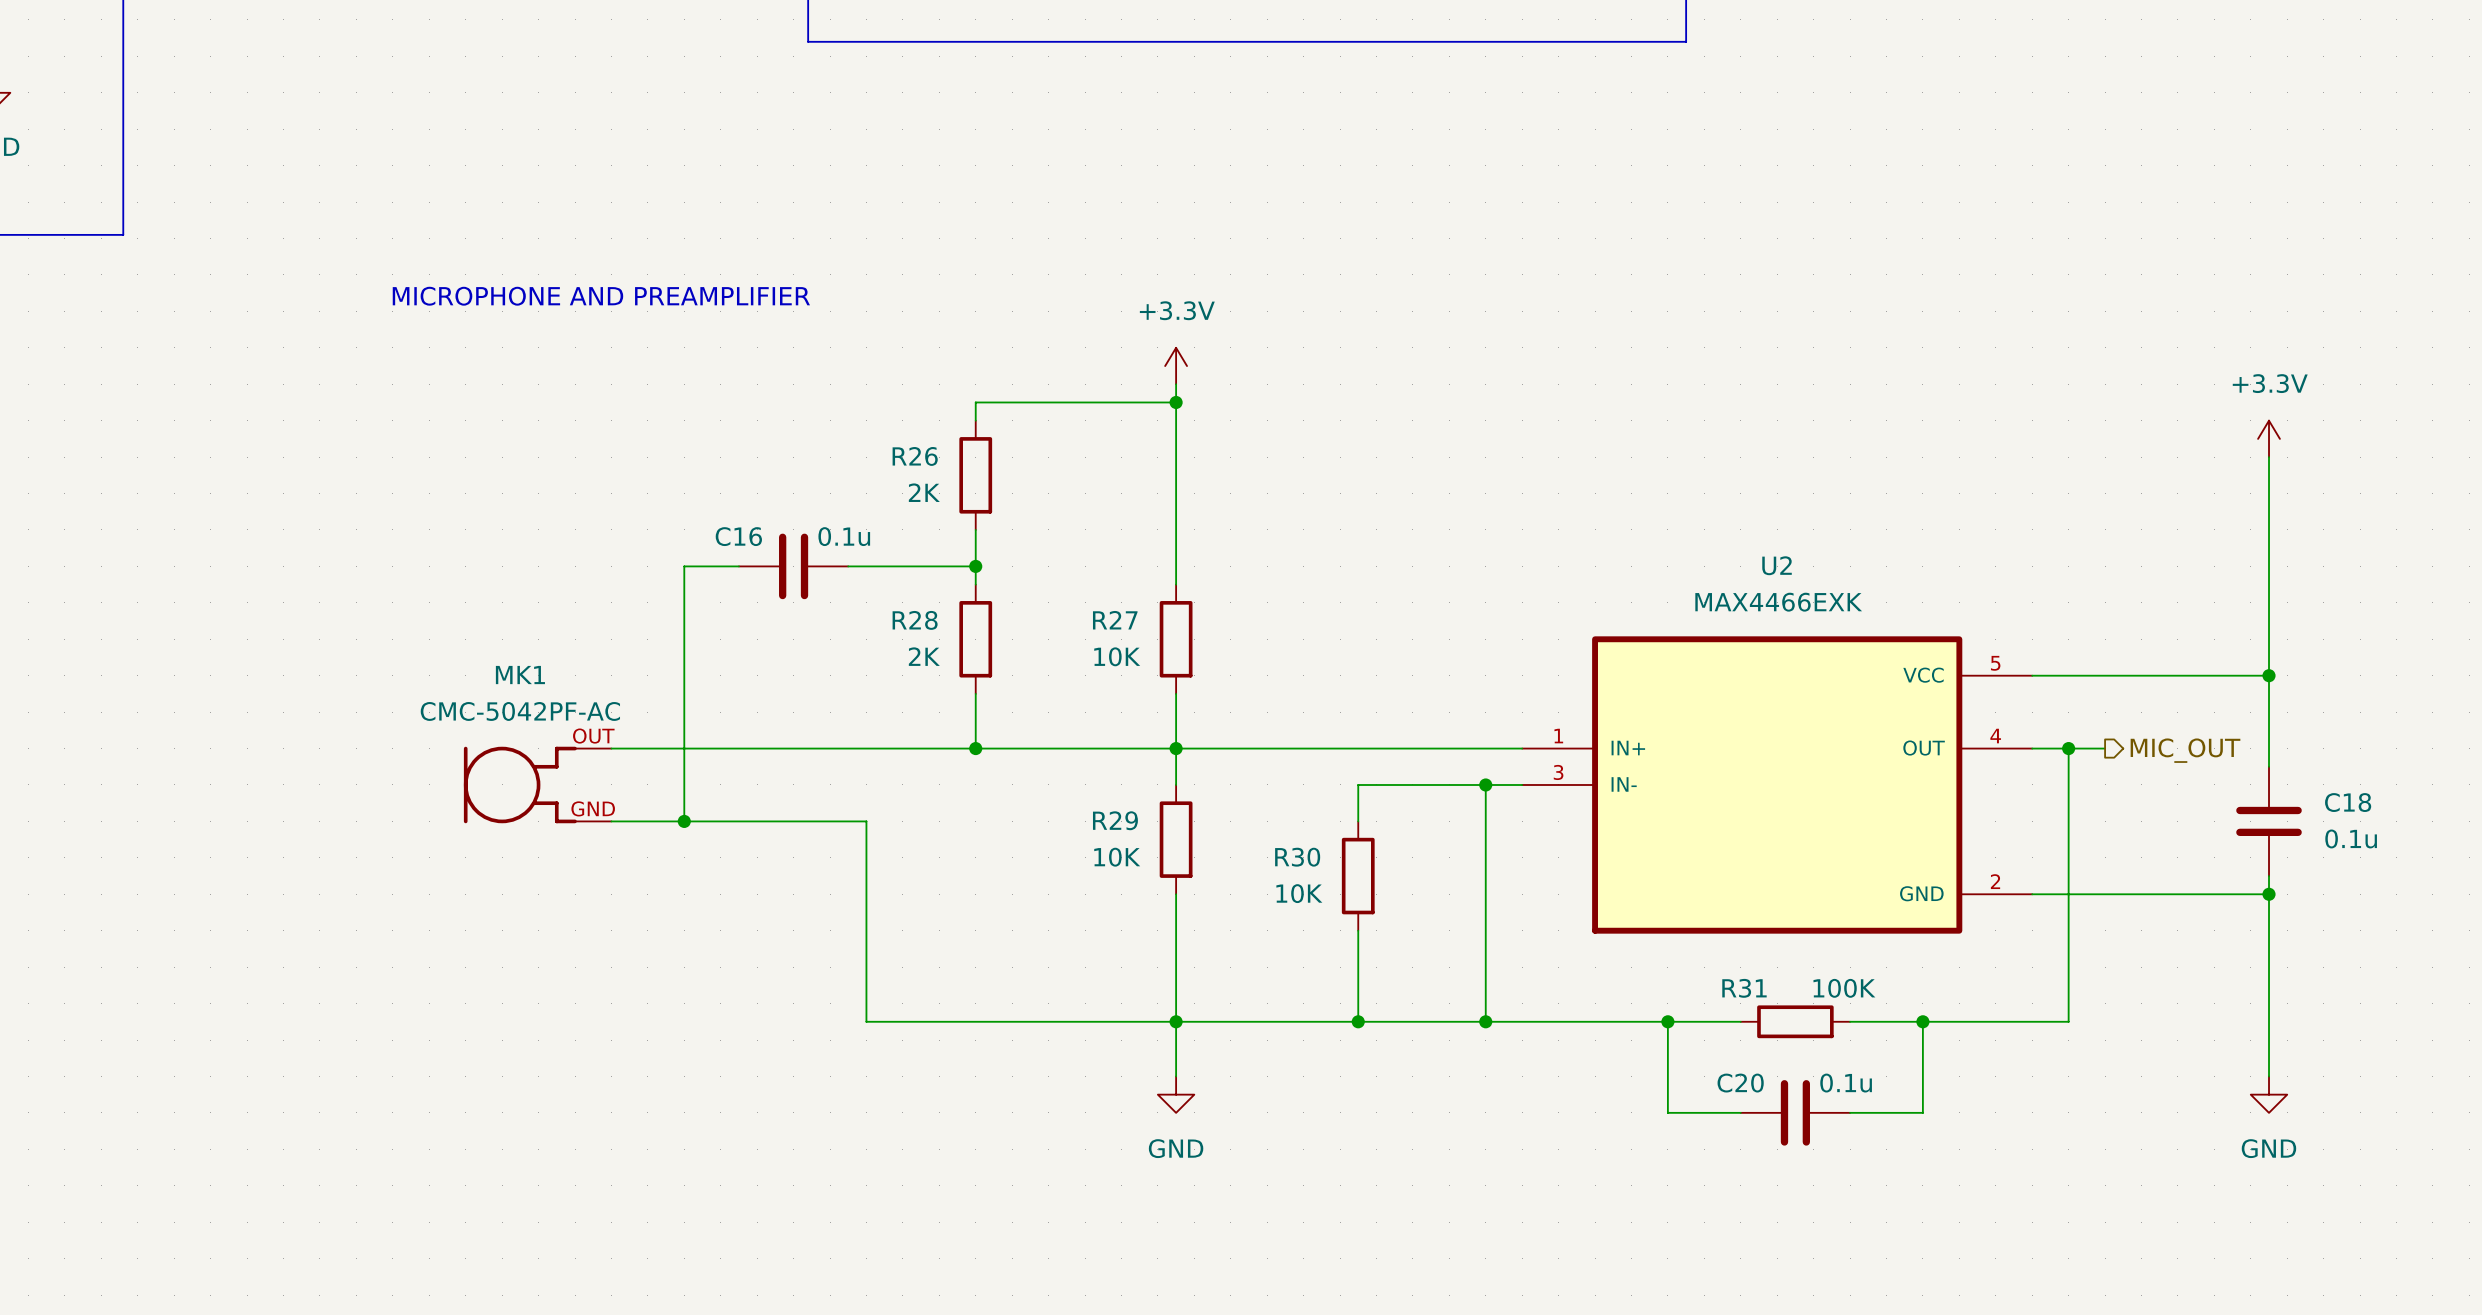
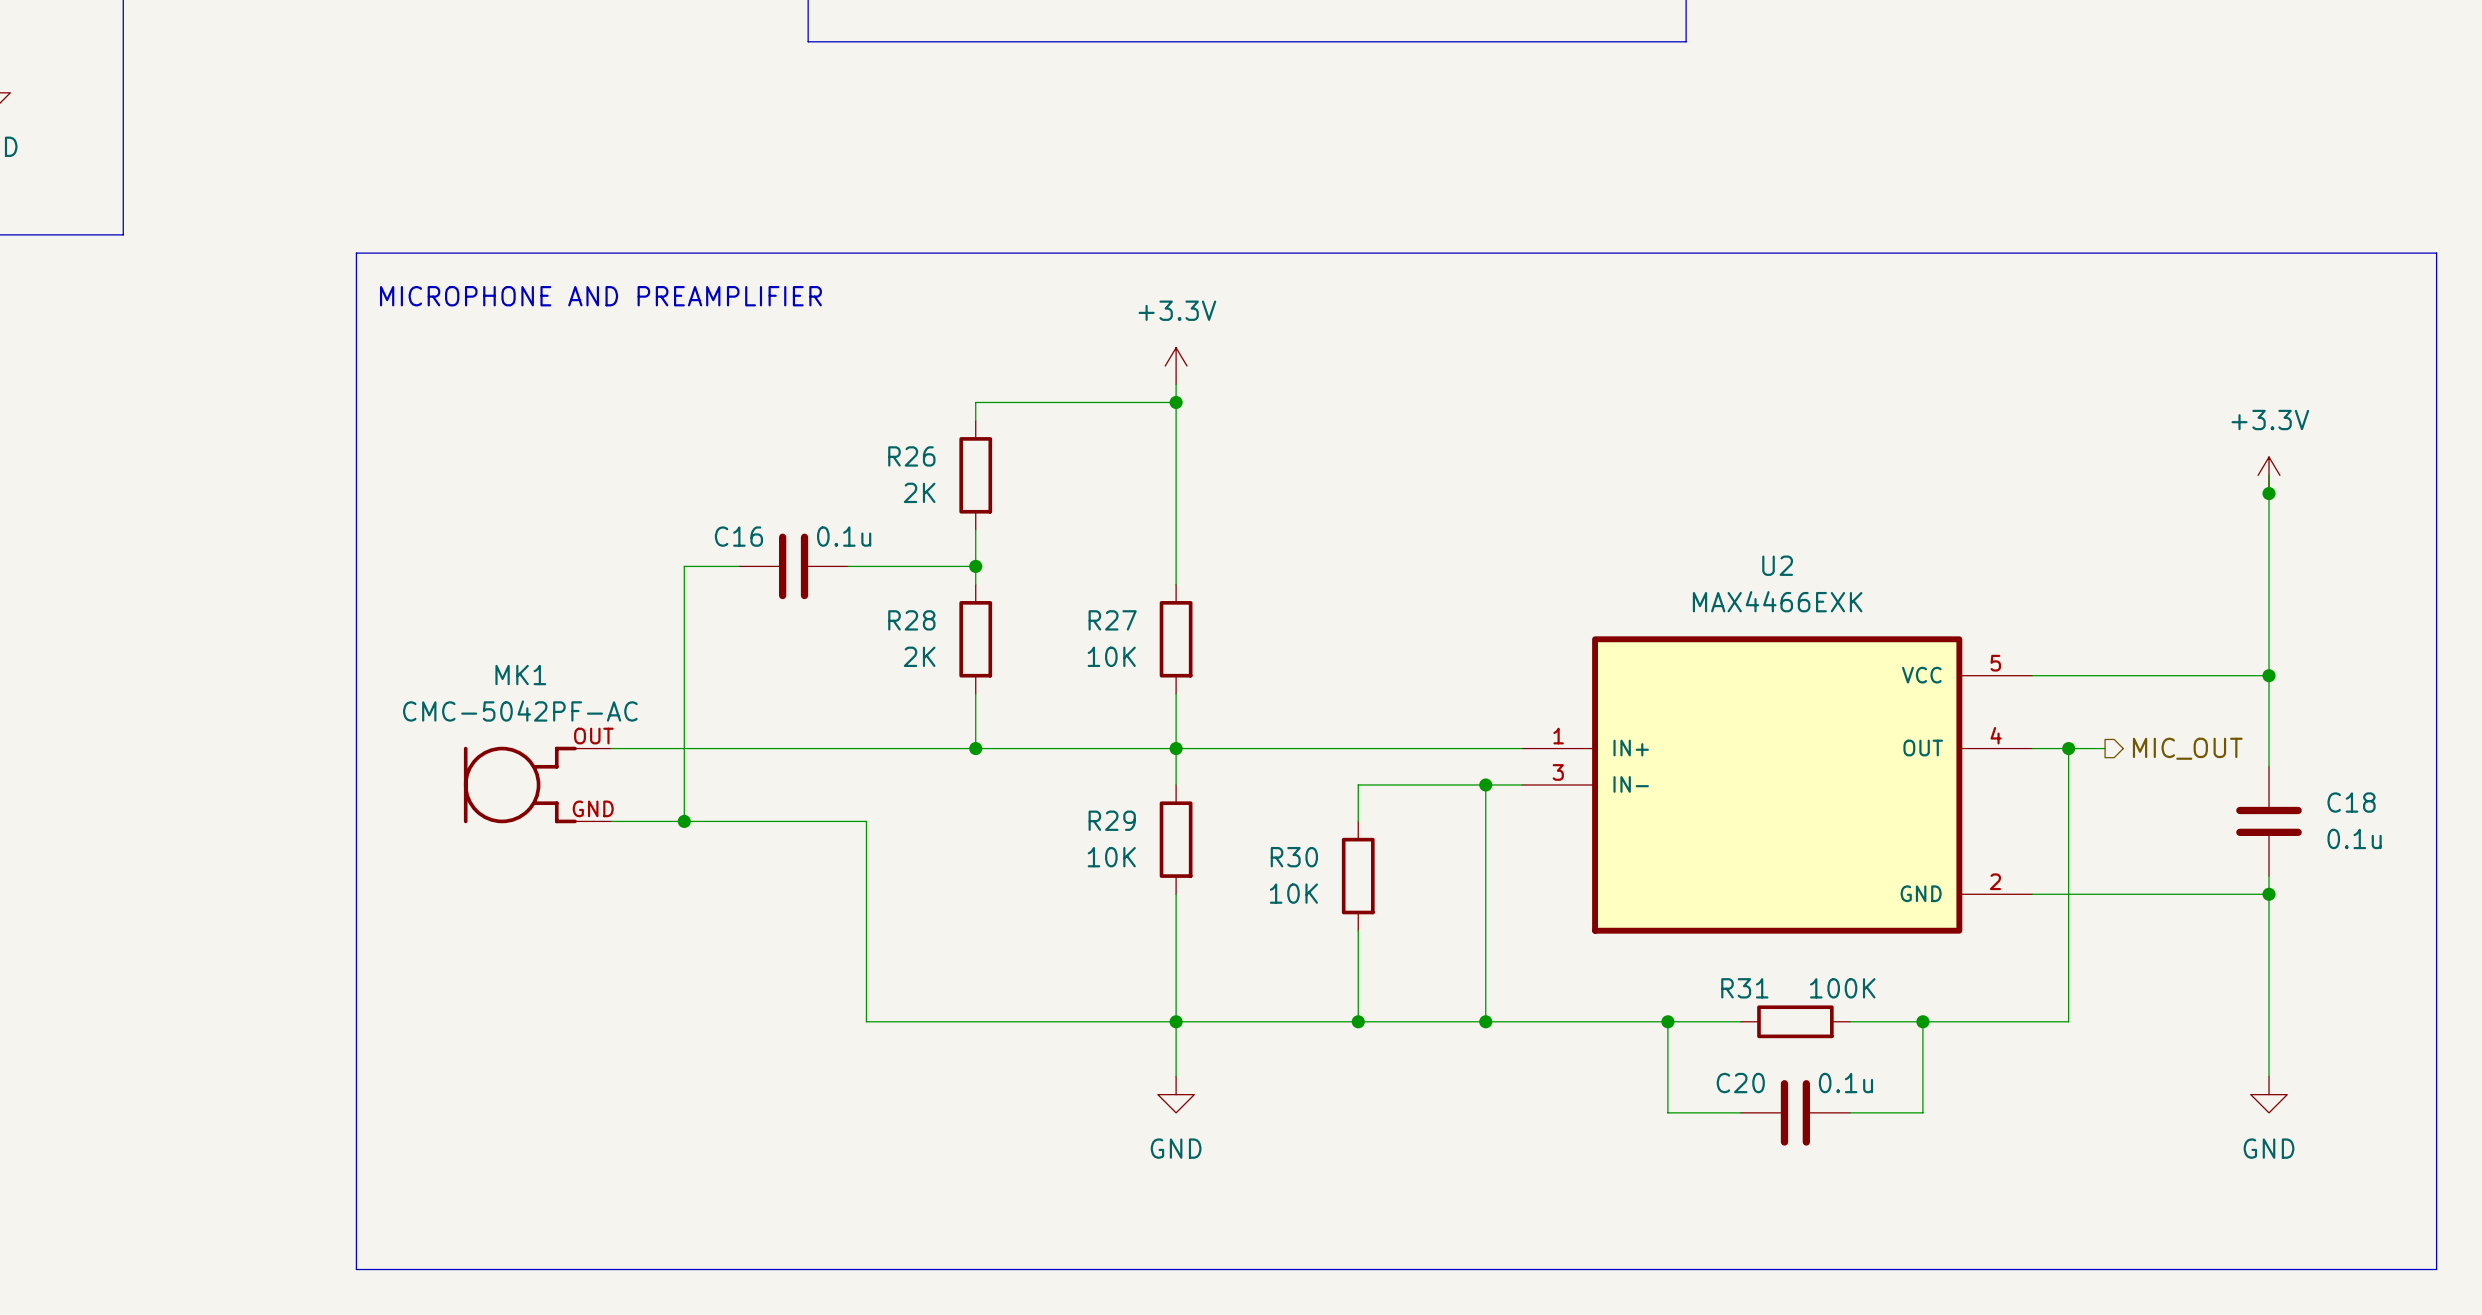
line: none -> (356, 253) (2436, 253) (2436, 1269) (356, 1269) (356, 253)
power symbol position: +3.3V (2269, 438) -> +3.3V (2269, 475)
junction: none -> (2269, 493)

